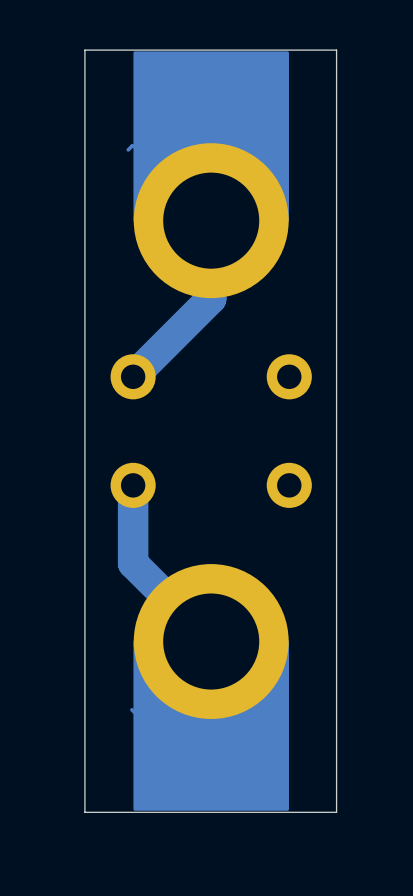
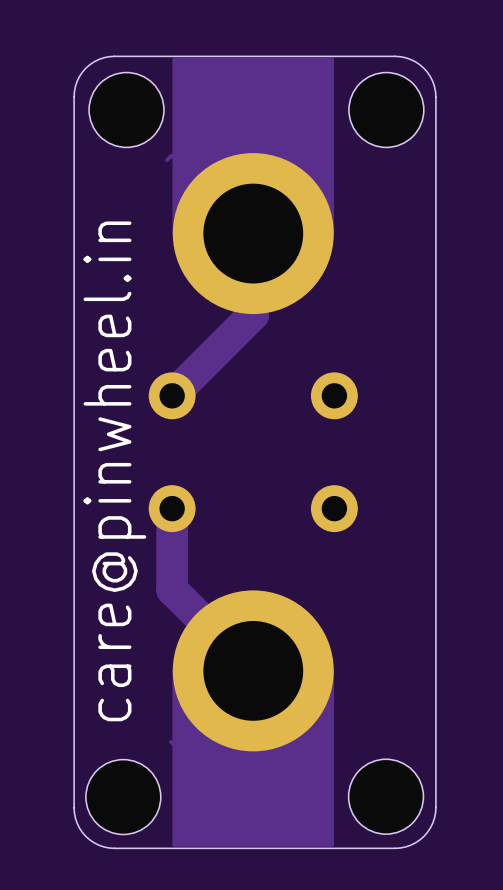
board edge: (84, 50) (84, 812) -> (122, 56) (104, 57) (89, 64) (77, 81) (74, 96) (74, 807) (77, 823) (89, 840) (104, 846) (122, 848)
board edge: (336, 50) (336, 812) -> (383, 56) (405, 57) (419, 64) (432, 81) (435, 97) (435, 812) (430, 827) (419, 839) (405, 846) (383, 848)
hole: none -> (126, 109)
hole: none -> (386, 109)
text: none -> care@pinwheel.in (114, 471)
hole: none -> (123, 797)
hole: none -> (386, 796)

